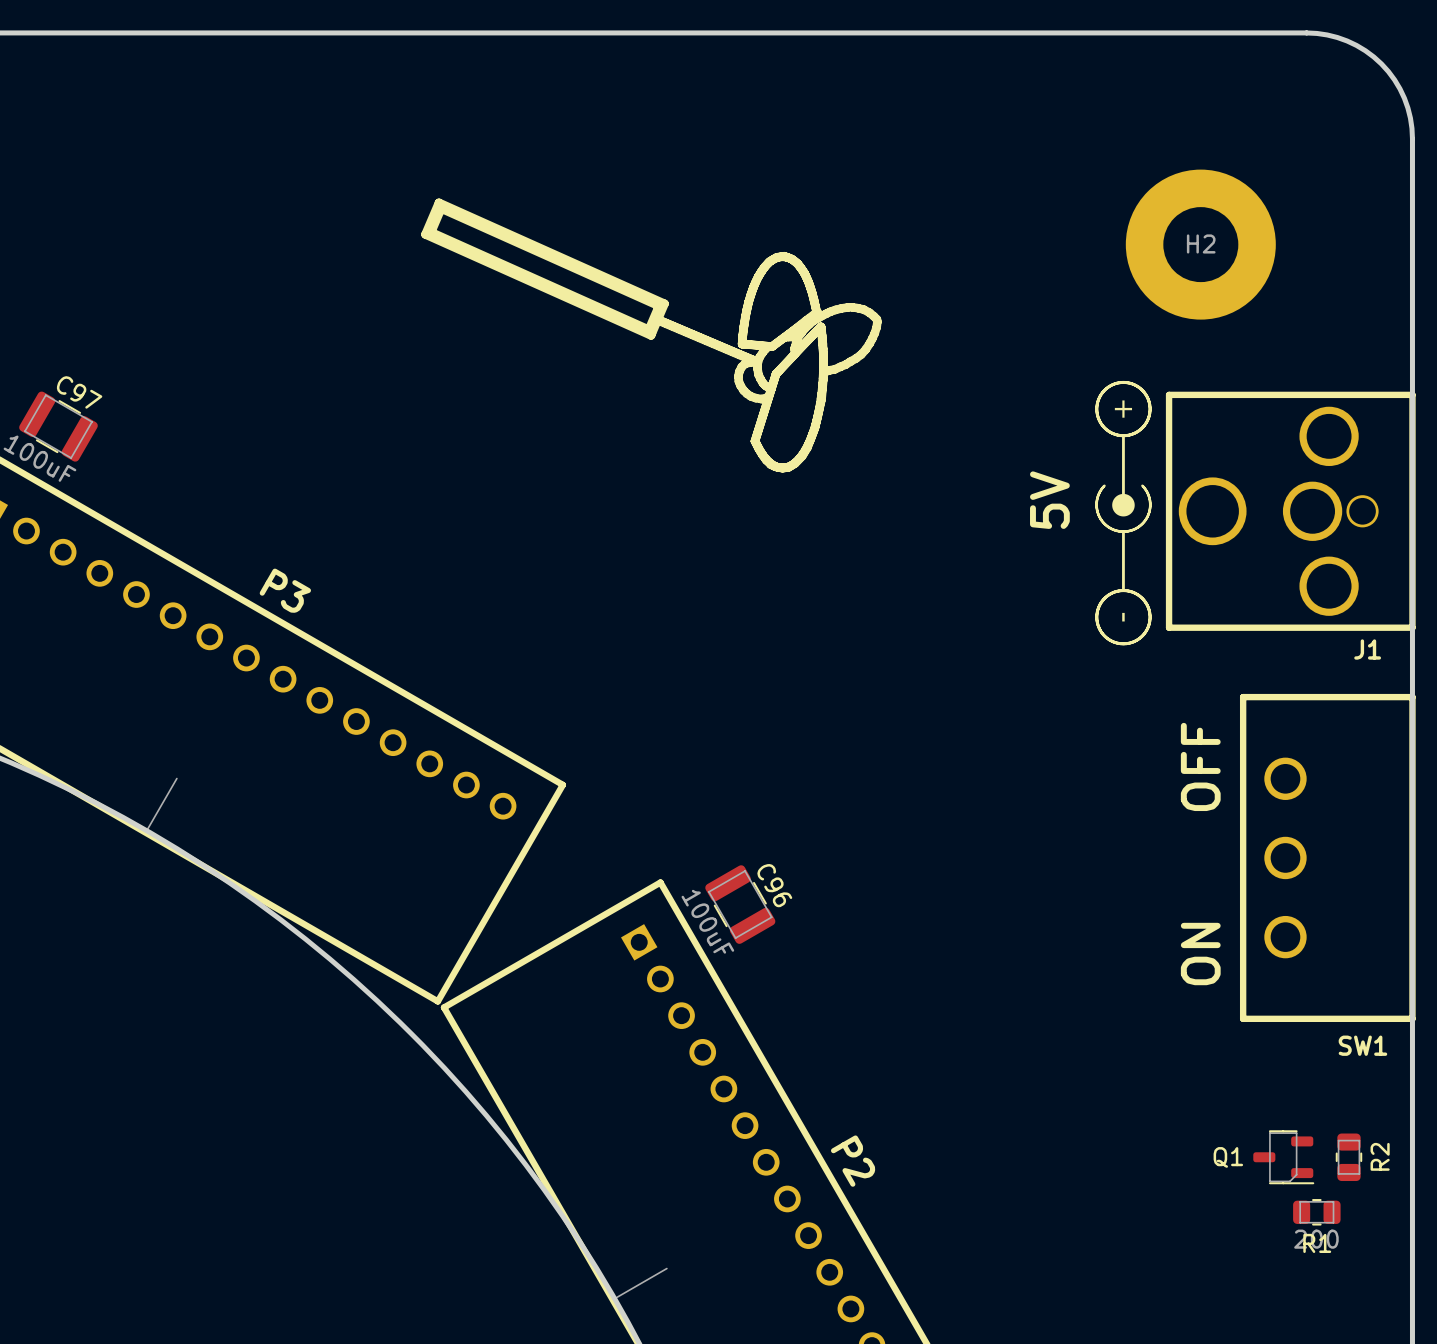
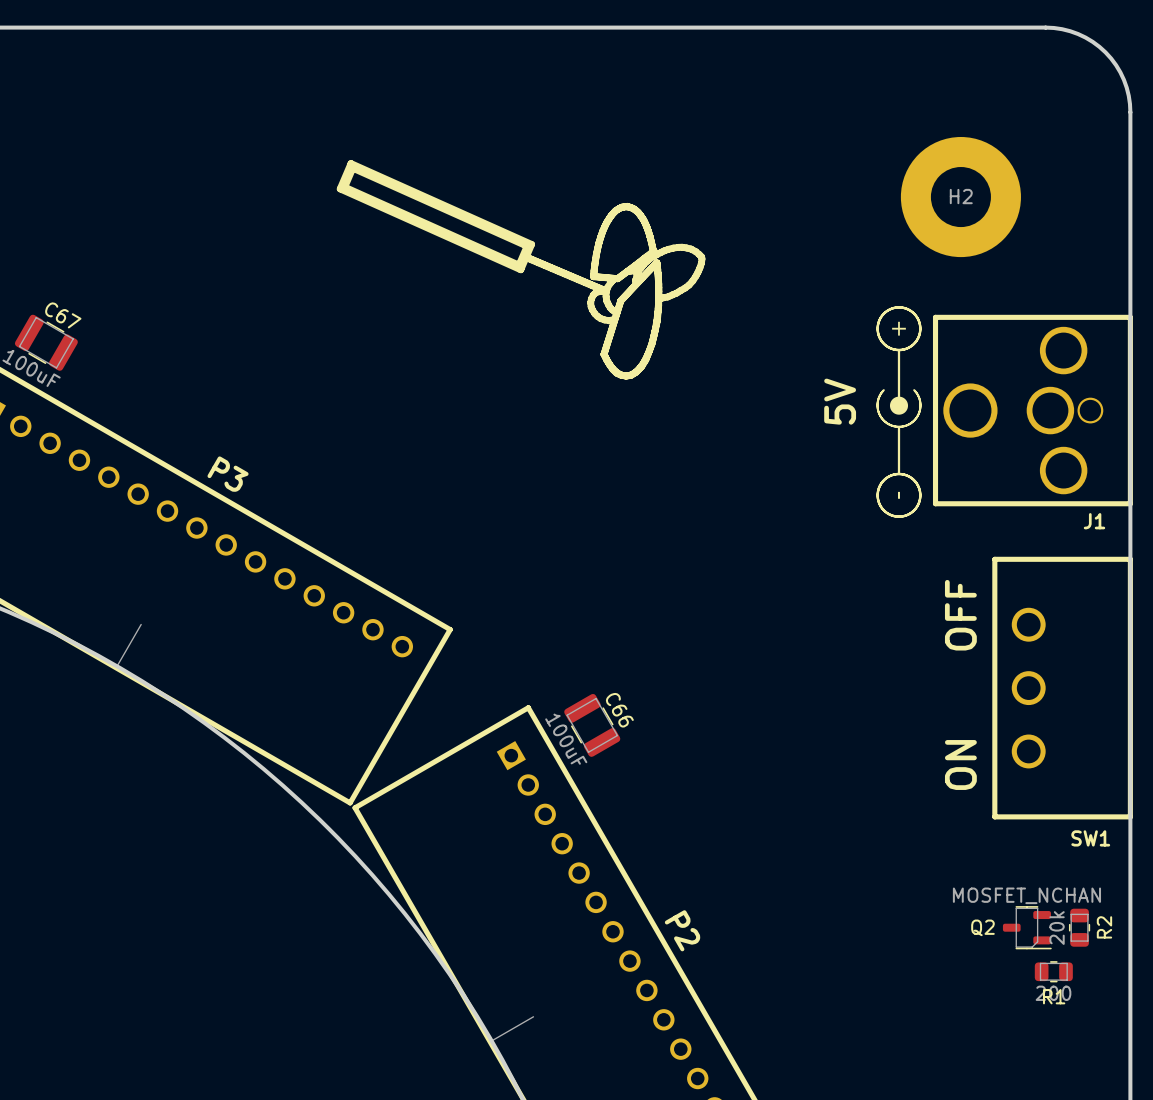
C97 name: C97 (79, 392) -> C67 (63, 315)
C96 name: C96 (774, 885) -> C66 (619, 710)
Q1 value: none -> MOSFET_NCHAN (1026, 895)
Q1 name: Q1 (1228, 1157) -> Q2 (982, 927)
R2 value: none -> 20k (1057, 928)

